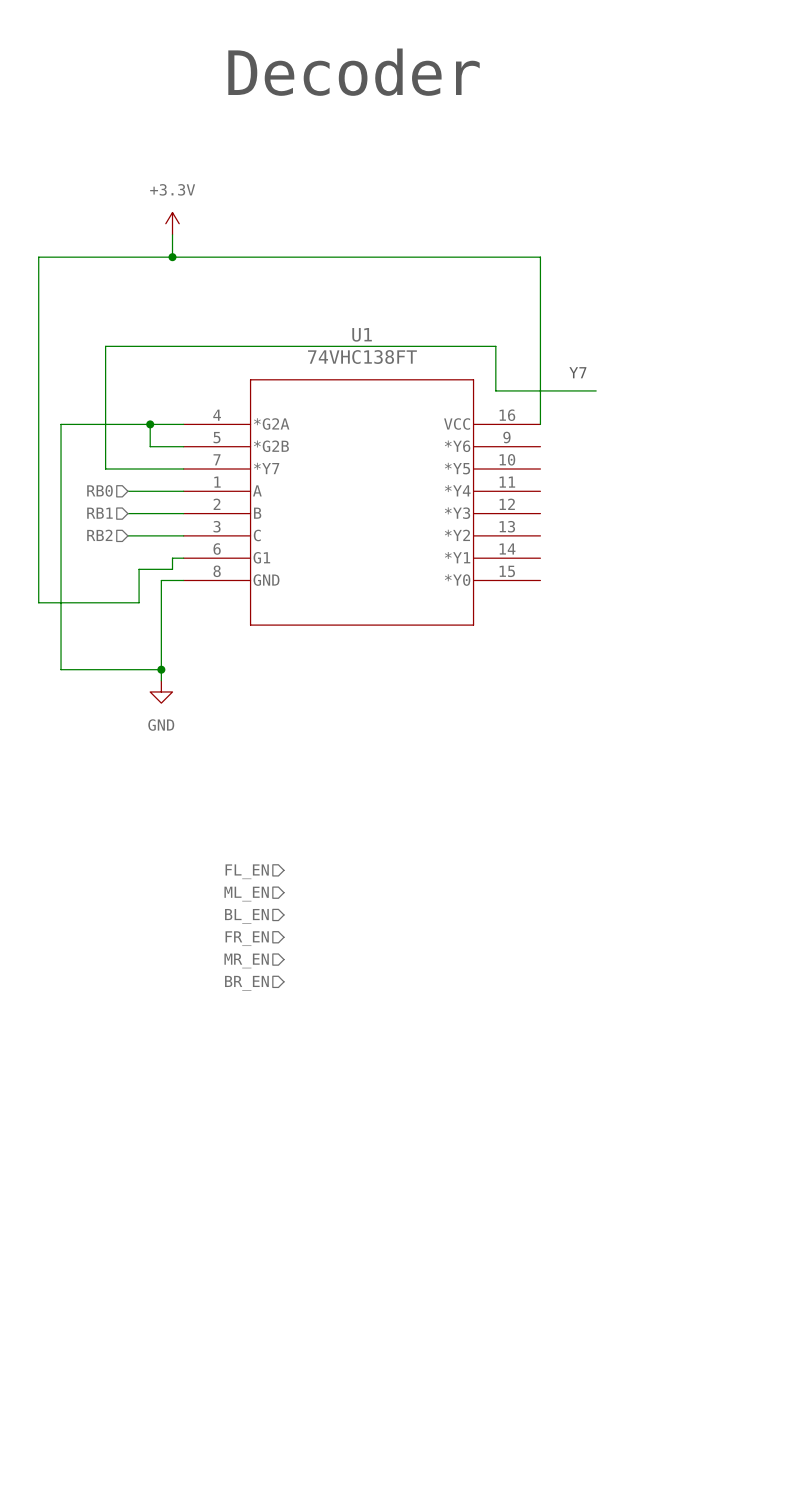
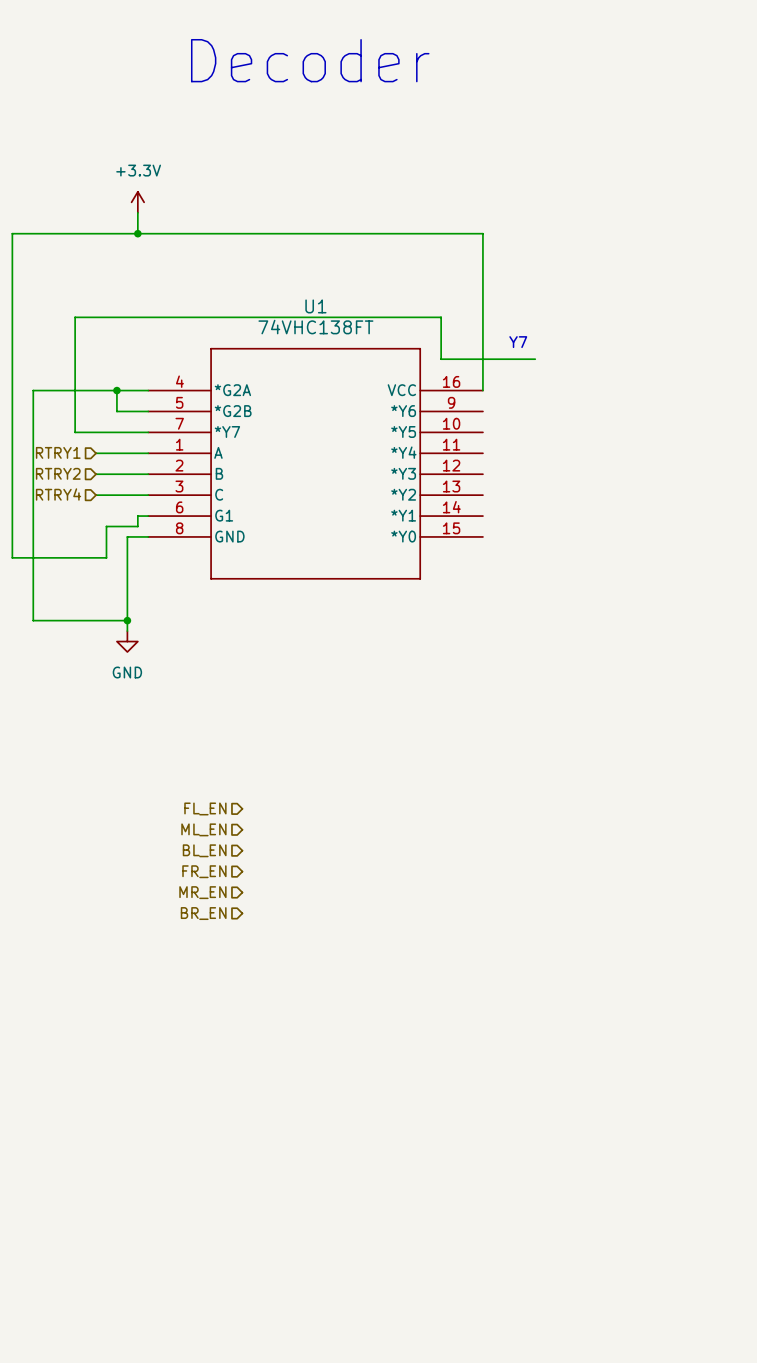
hierarchical label: RB0 (99, 490) -> RTRY1 (58, 452)
hierarchical label: RB1 (99, 513) -> RTRY2 (58, 473)
hierarchical label: RB2 (99, 535) -> RTRY4 (58, 494)

